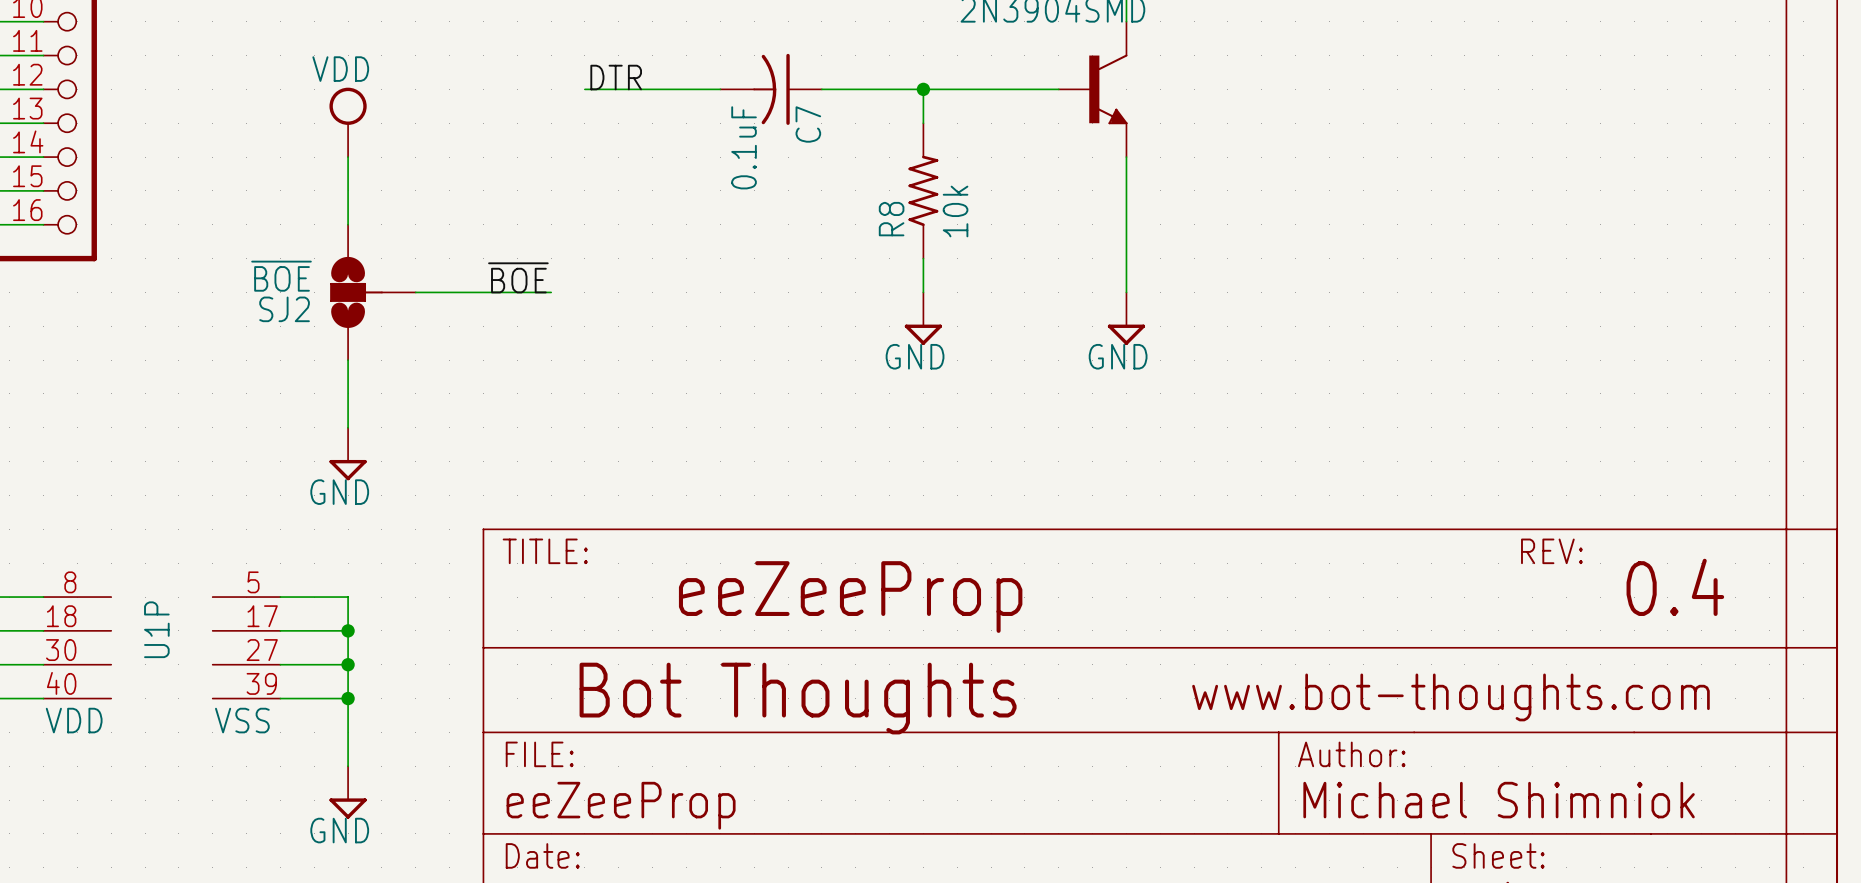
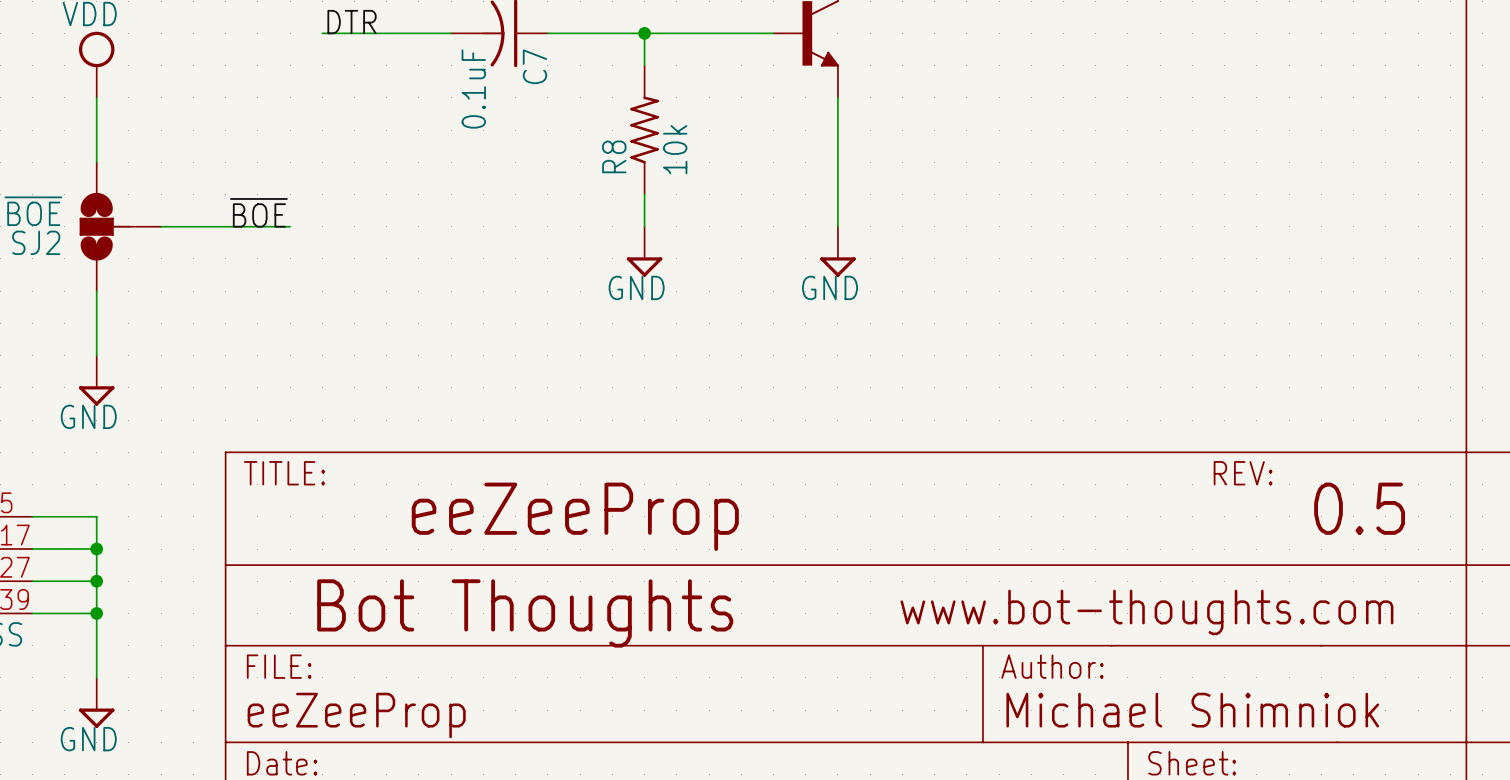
text: 0.4 (1675, 587) -> 0.5 (1359, 508)

